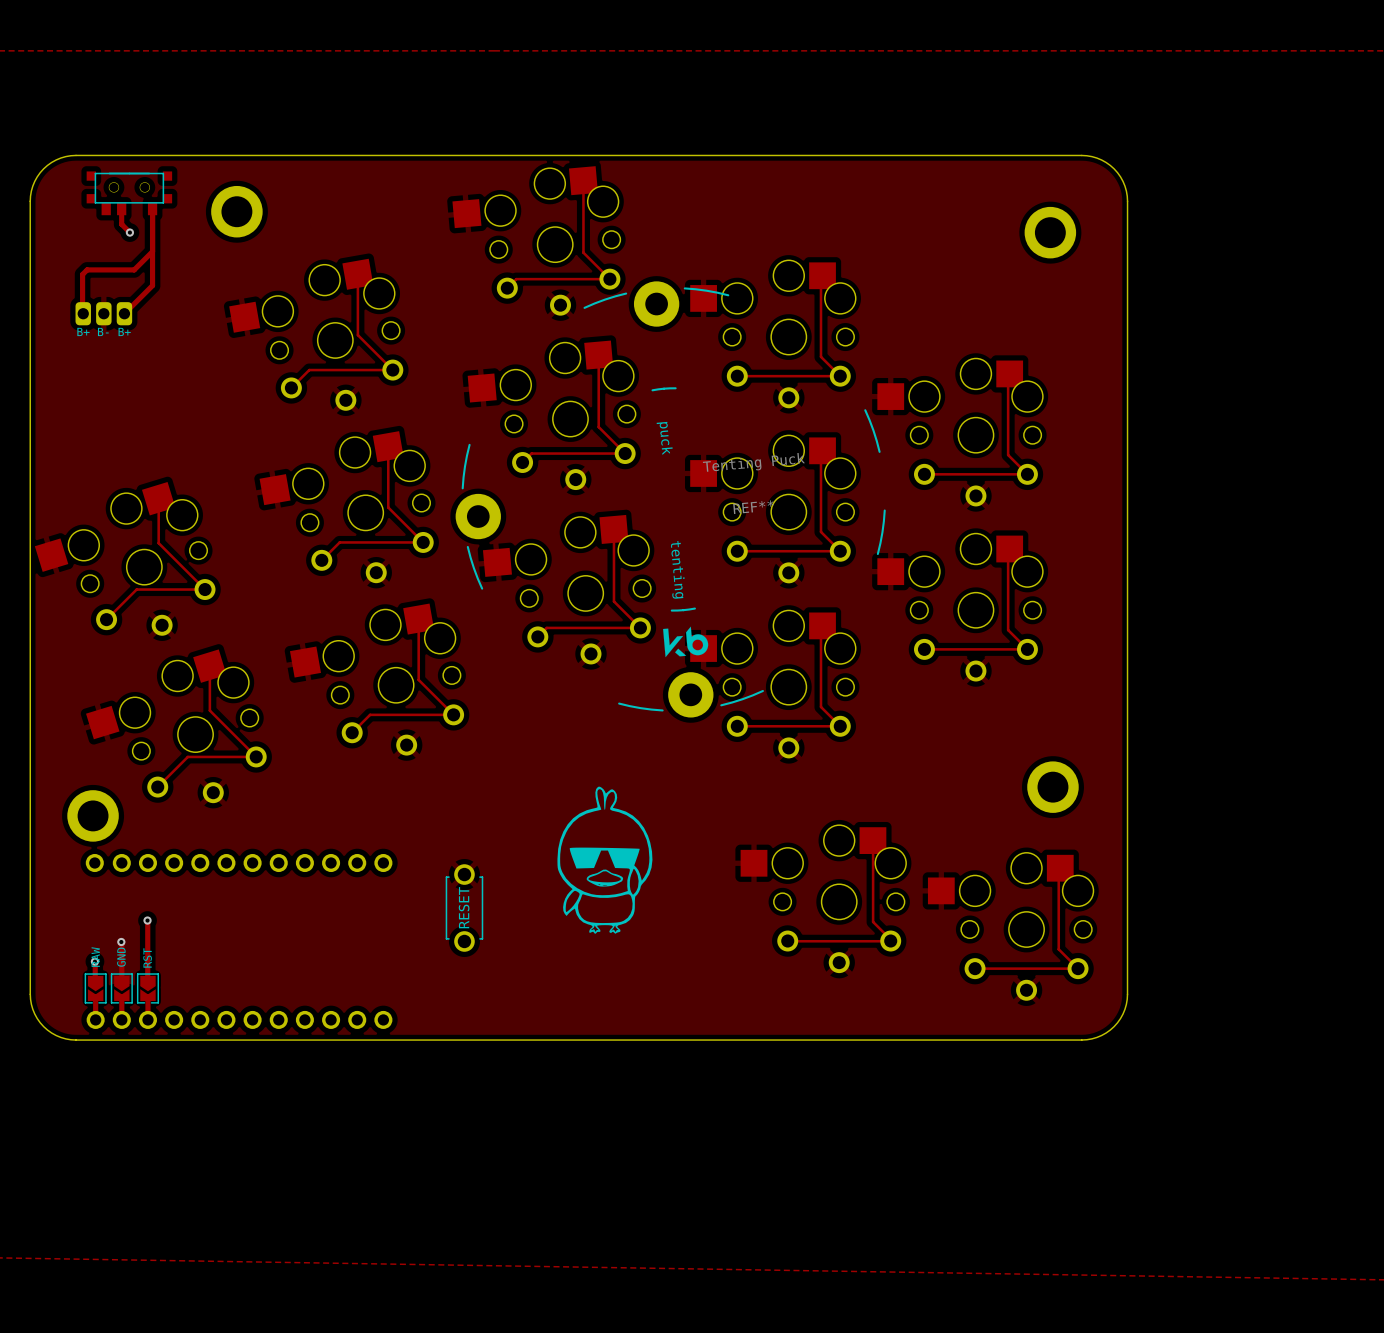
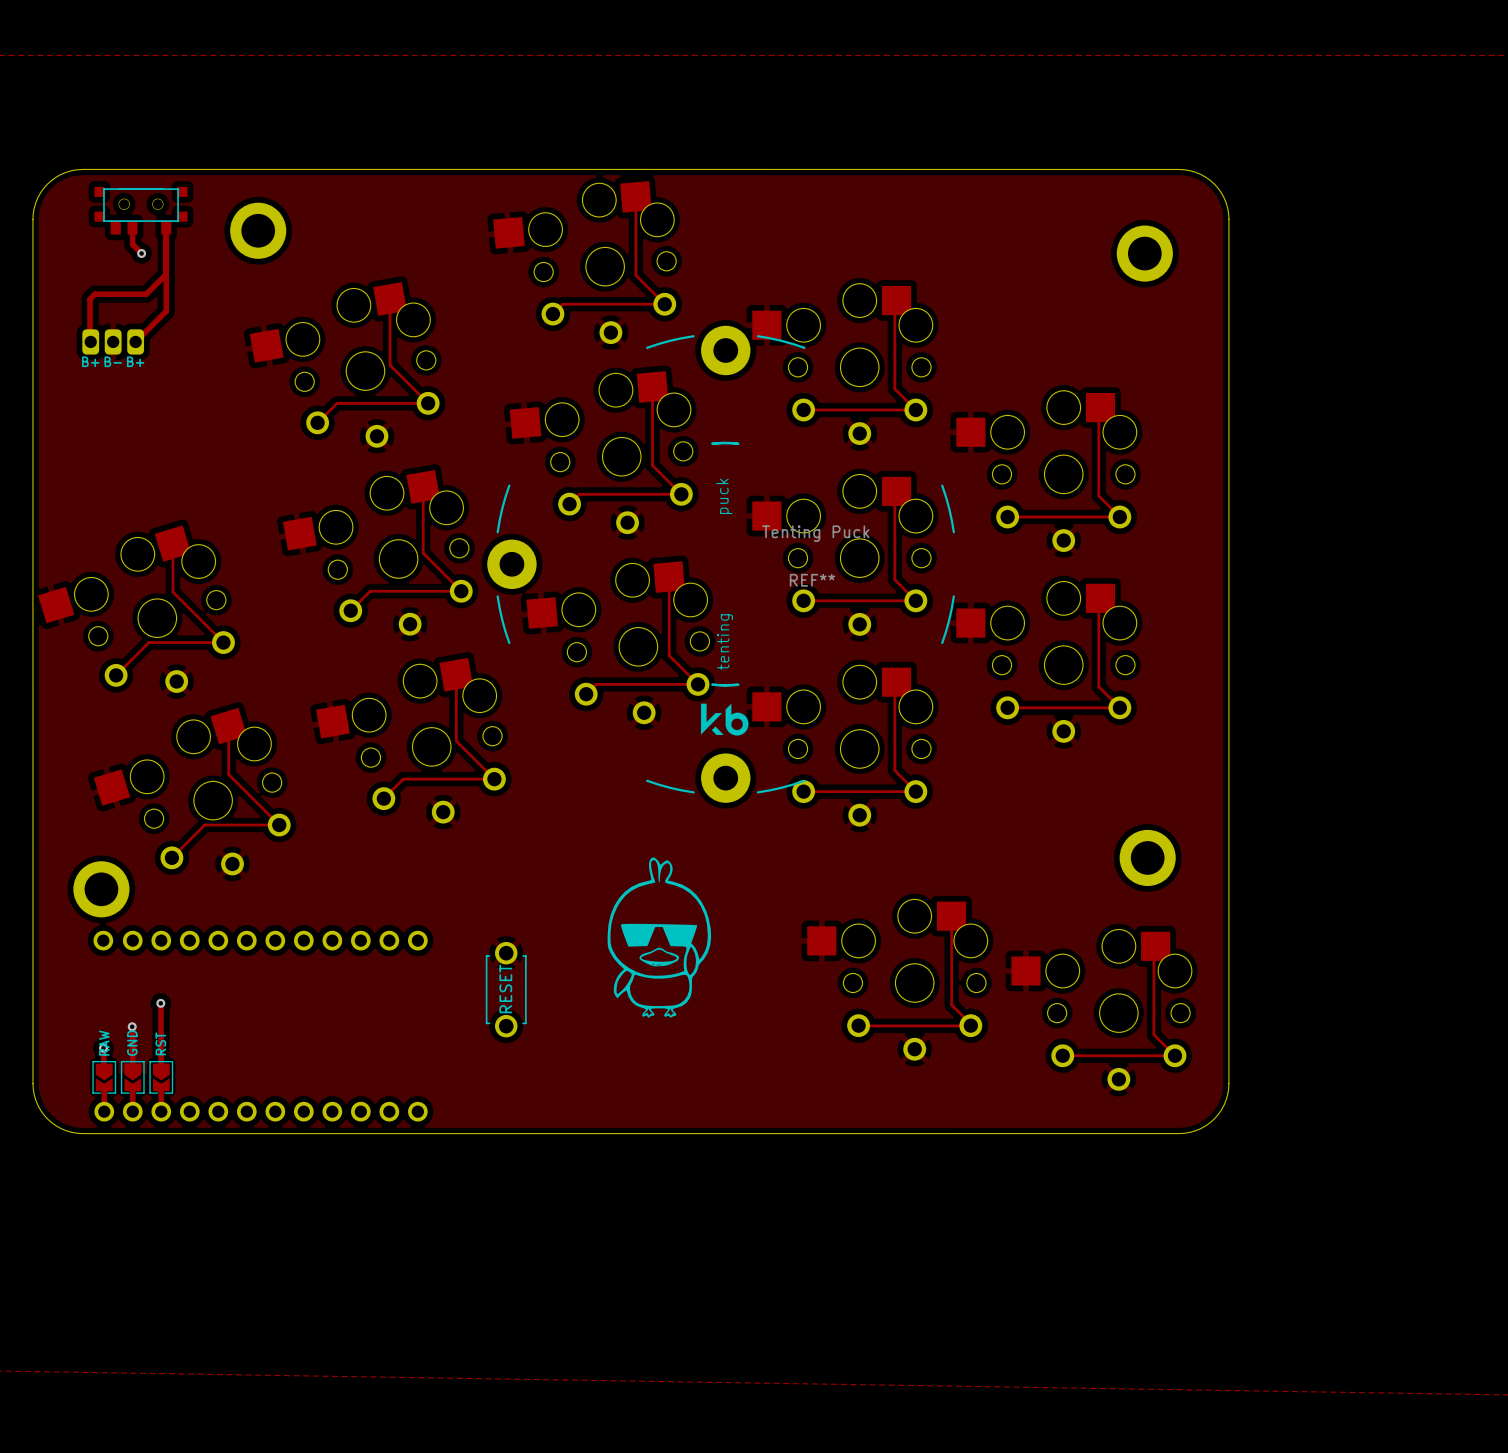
REF**: Tenting Puck (670, 499) -> none
REF**: none -> Tenting Puck (721, 564)

